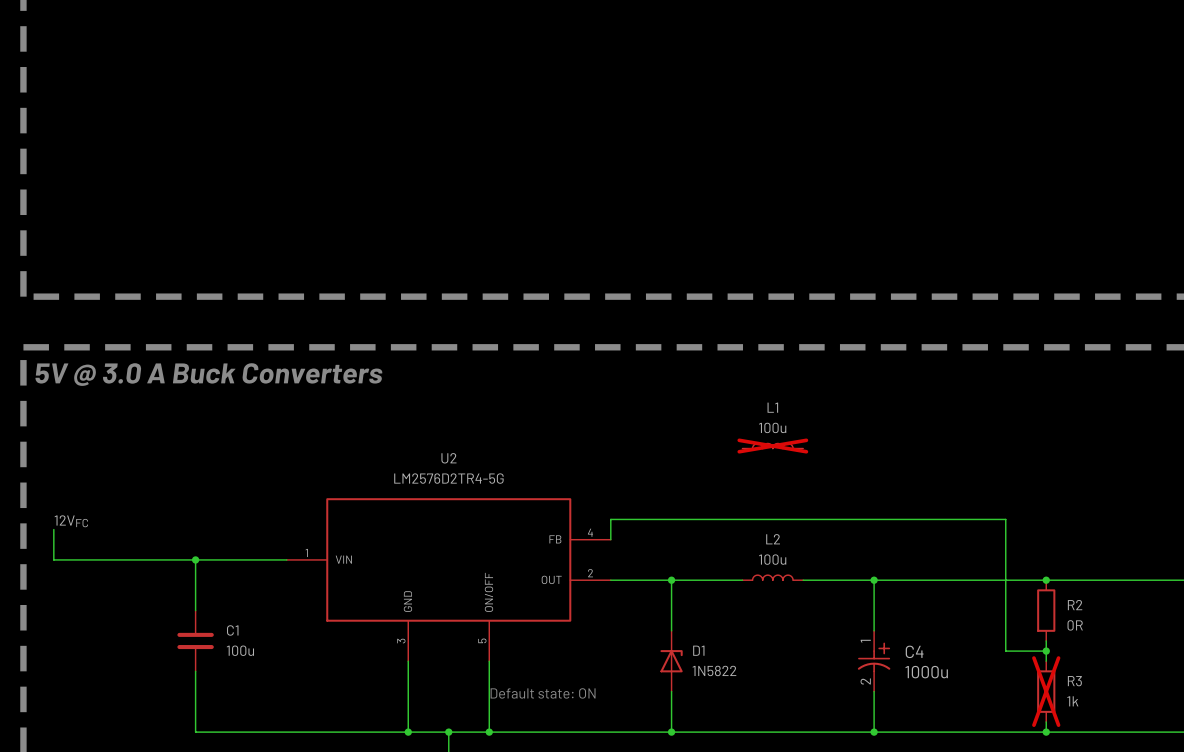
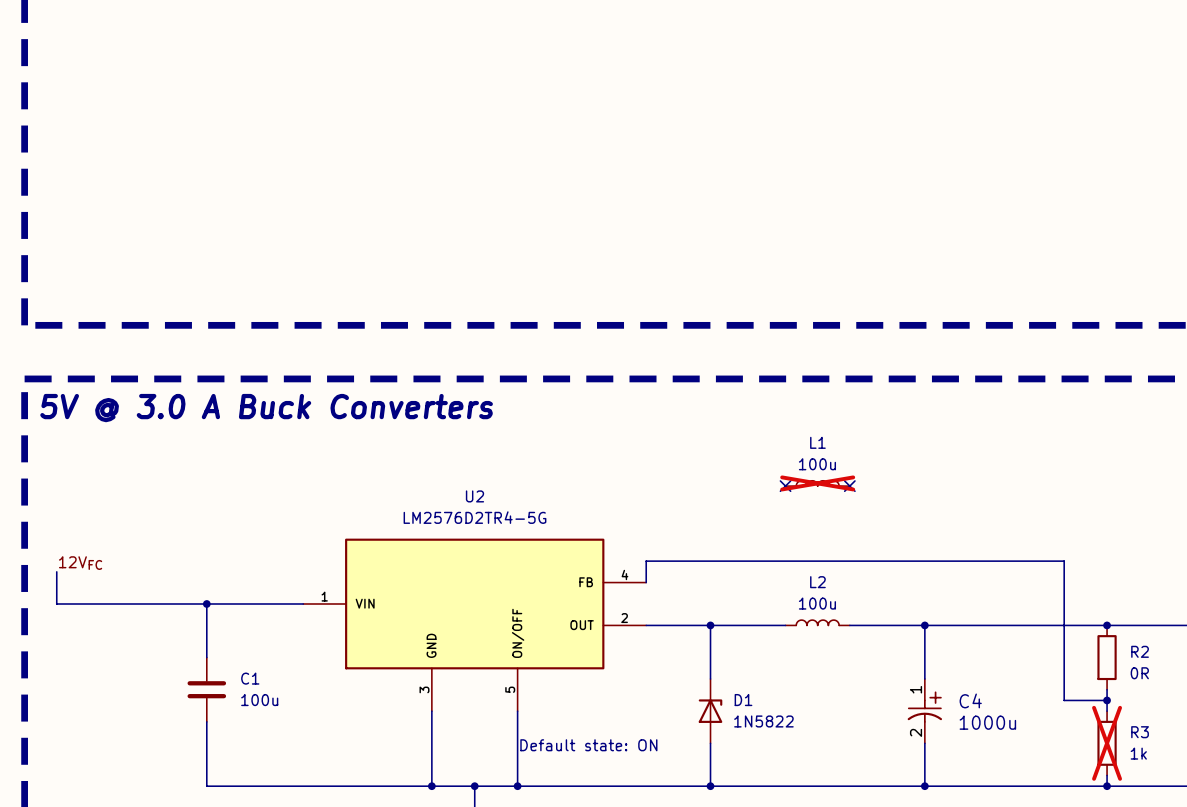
no-connect mark: none -> (785, 486)
no-connect mark: none -> (849, 486)

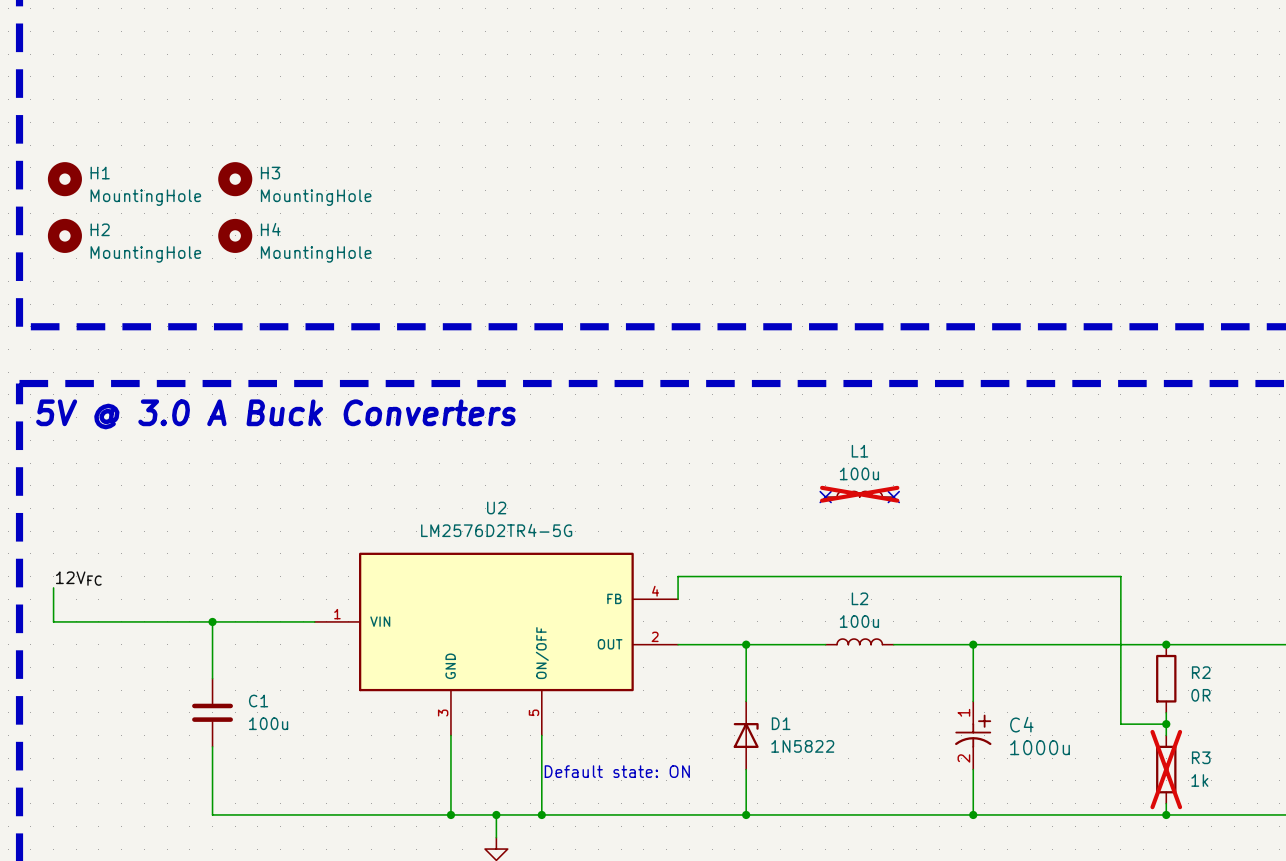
H1: none -> MountingHole (64, 179)
H3: none -> MountingHole (235, 179)
H2: none -> MountingHole (64, 235)
H4: none -> MountingHole (235, 235)

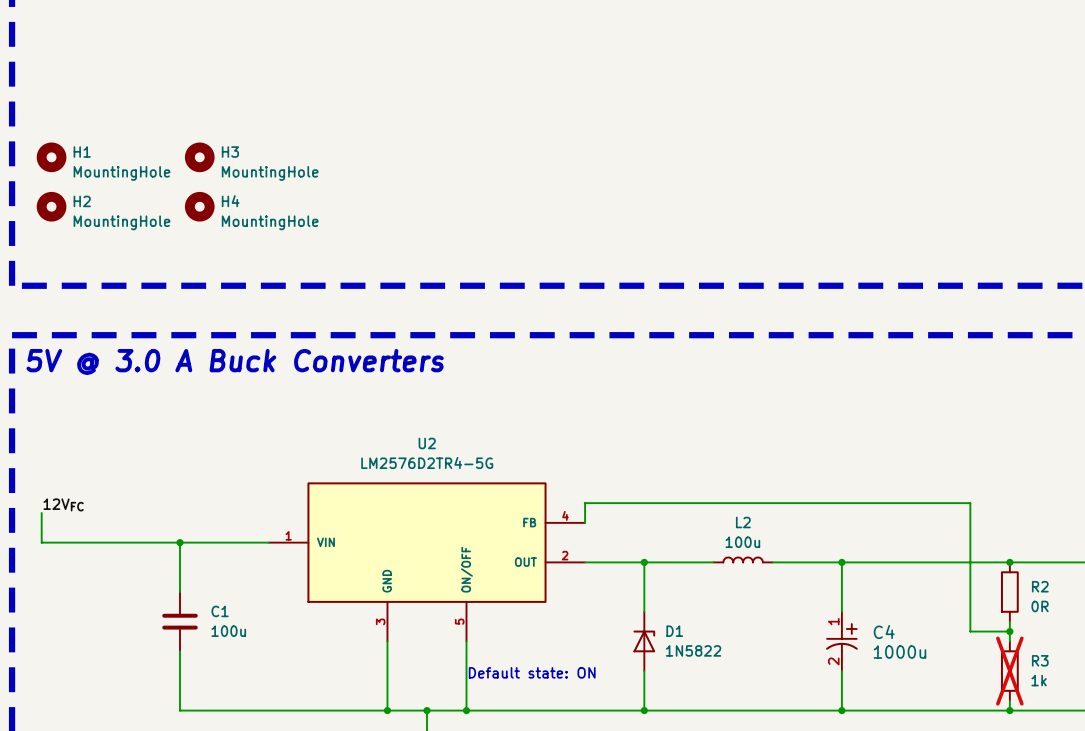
L1: 100u (859, 494) -> none
no-connect mark: (825, 497) -> none
no-connect mark: (893, 497) -> none

